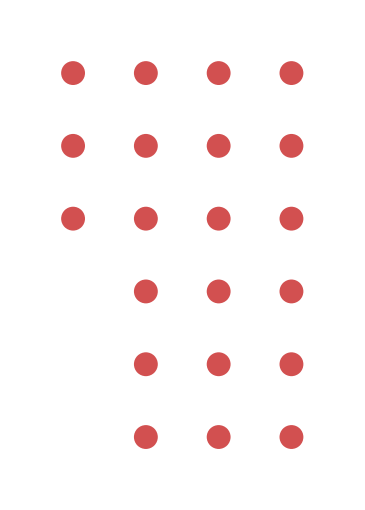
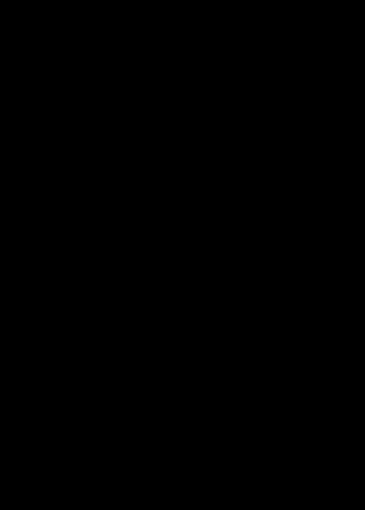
part: (73, 73) -> none
part: (145, 73) -> none
part: (218, 73) -> none
part: (291, 73) -> none
part: (73, 145) -> none
part: (145, 145) -> none
part: (218, 145) -> none
part: (291, 145) -> none
part: (73, 218) -> none
part: (145, 218) -> none
part: (218, 218) -> none
part: (291, 218) -> none
part: (145, 291) -> none
part: (218, 291) -> none
part: (291, 291) -> none
part: (145, 364) -> none
part: (218, 364) -> none
part: (291, 364) -> none
part: (145, 437) -> none
part: (218, 437) -> none
part: (291, 437) -> none

